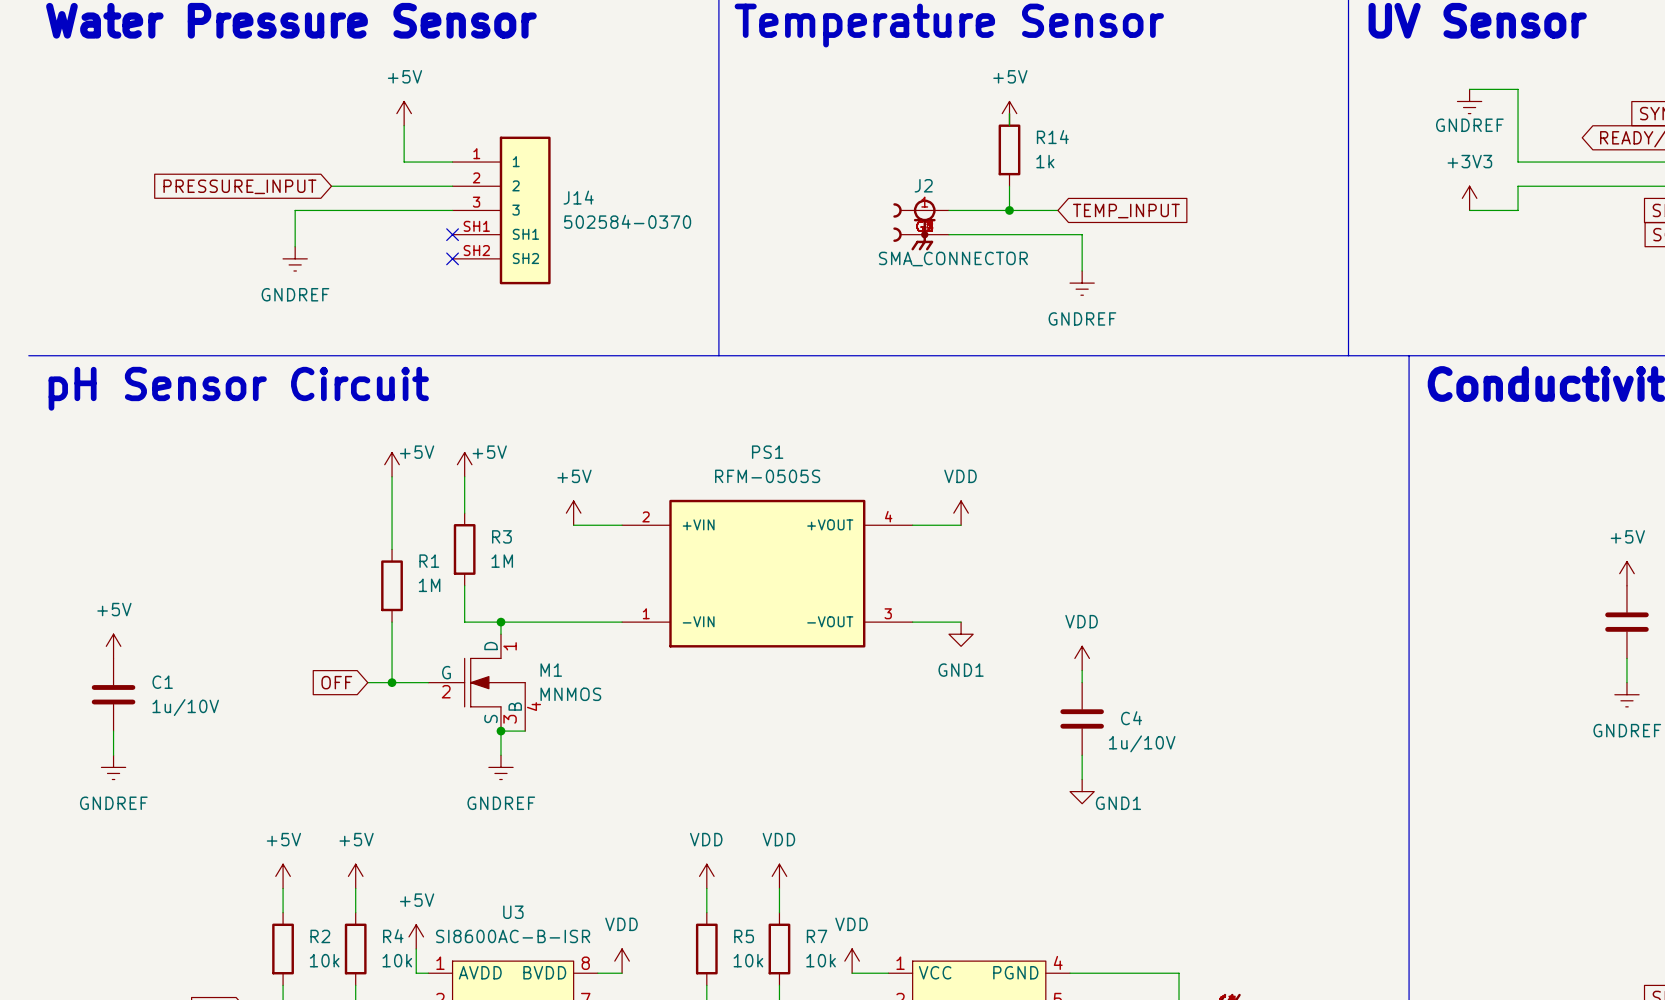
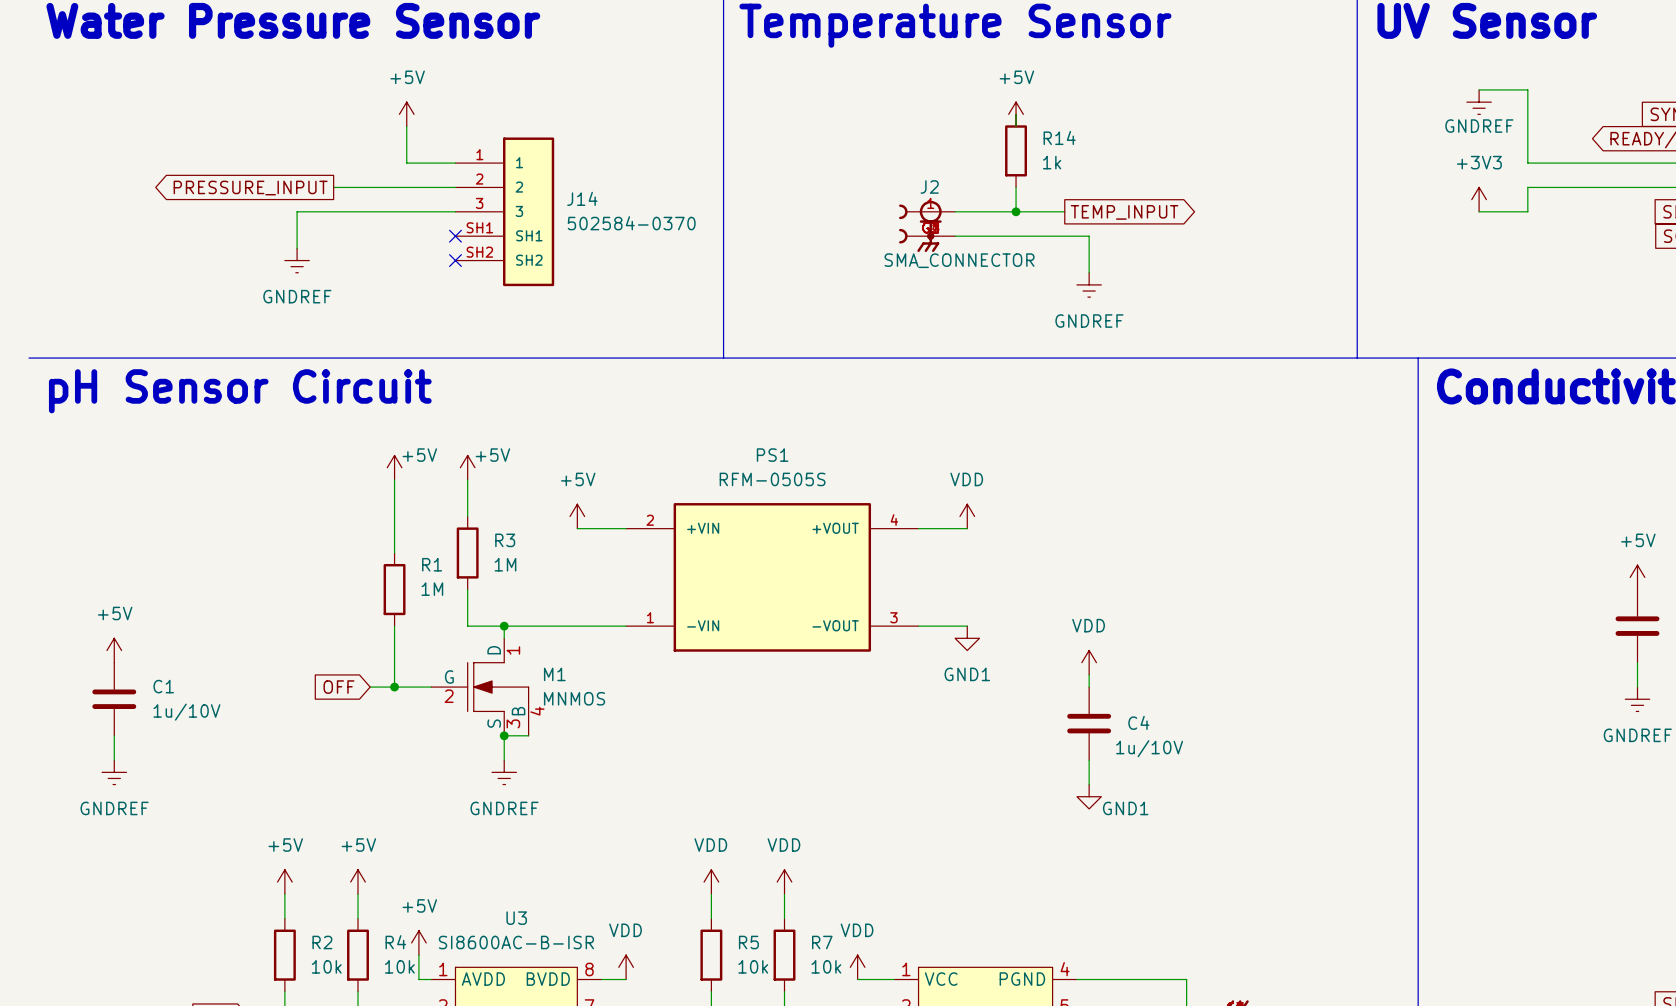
global label shape: input (239, 186) -> output (250, 188)
global label shape: input (1126, 211) -> output (1124, 212)

